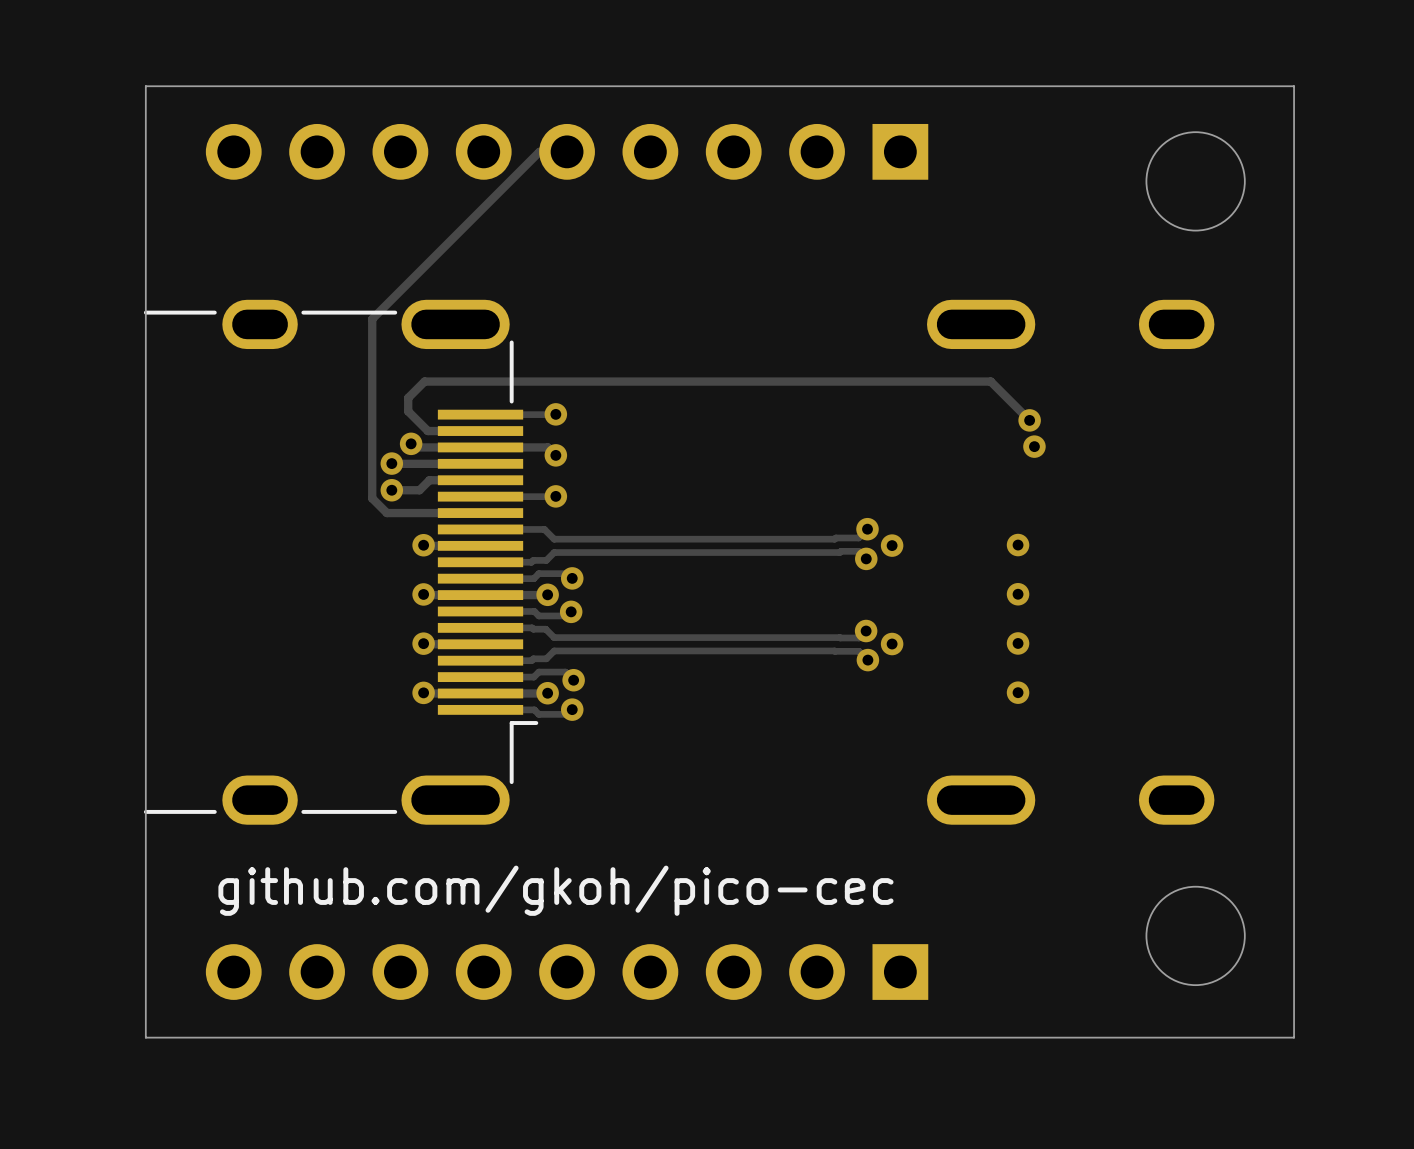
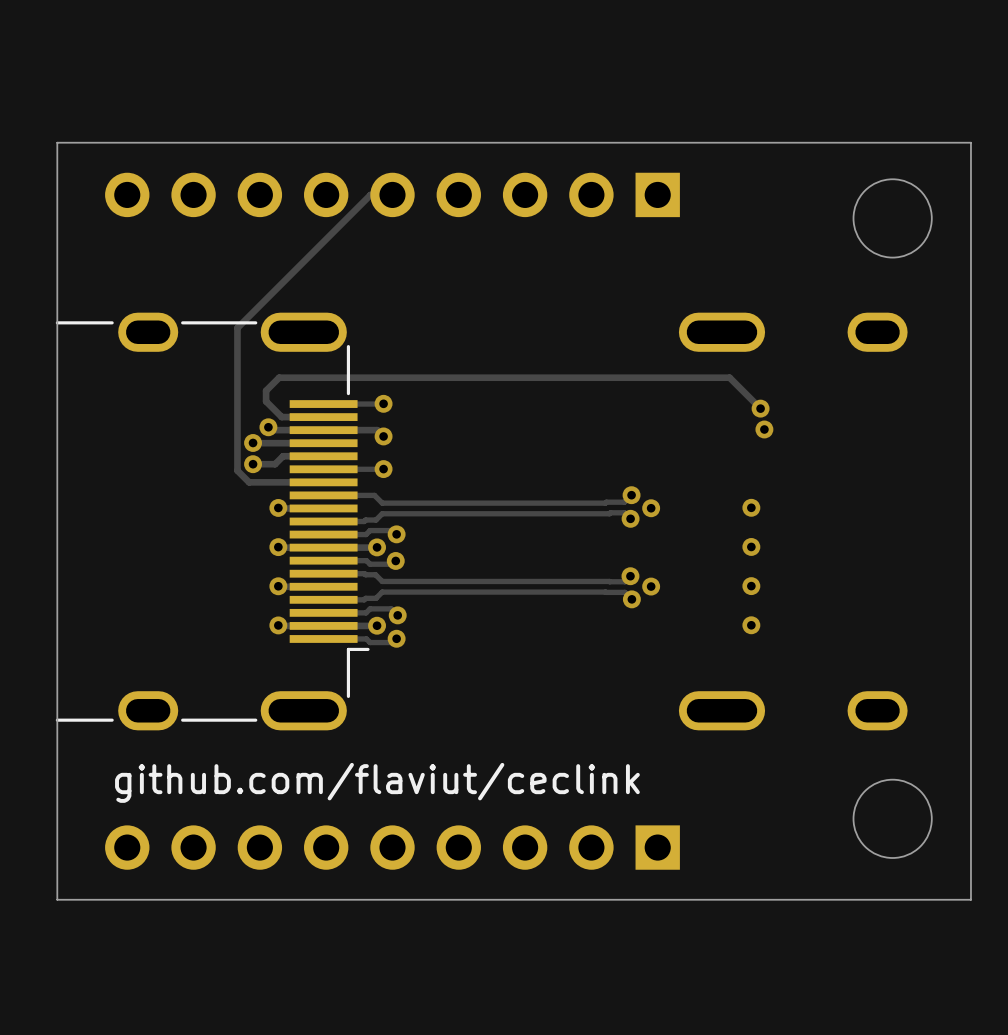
text: github.com/gkoh/pico-cec (555, 890) -> github.com/flaviut/ceclink (377, 782)

